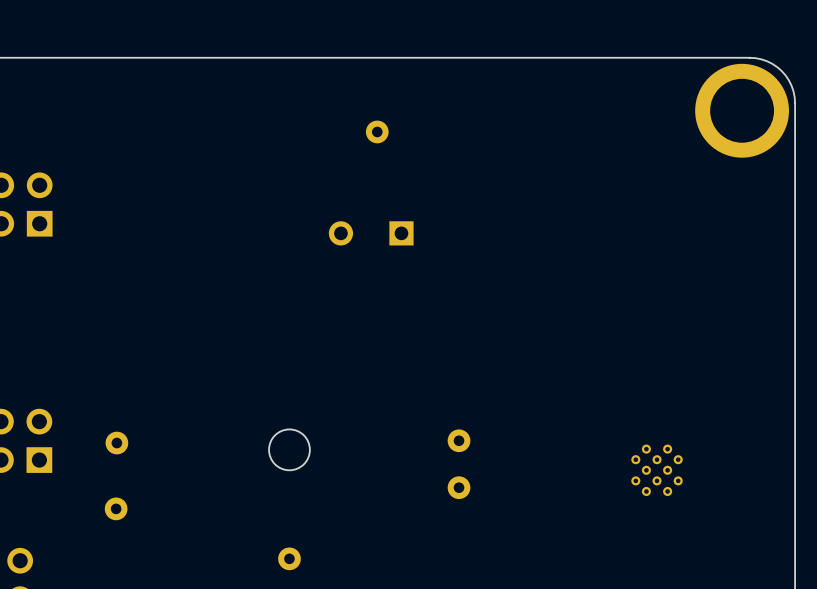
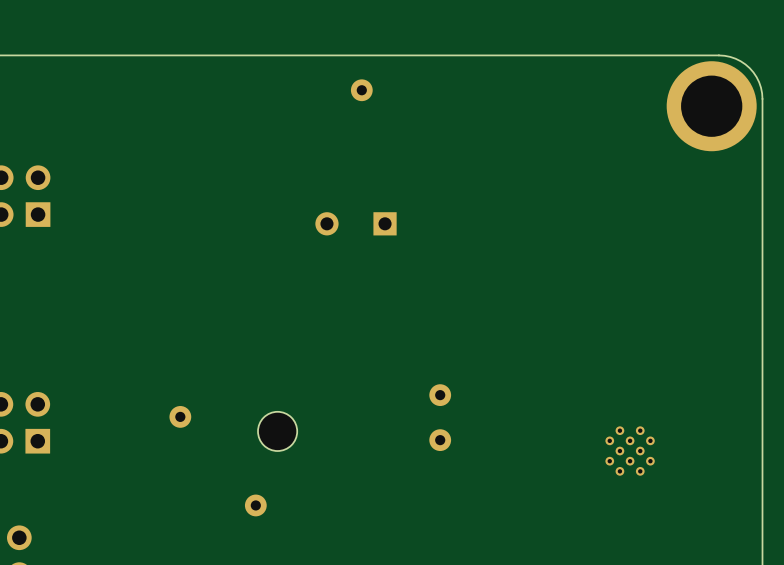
part position: (377, 131) -> (361, 90)
part: none -> (440, 395)
part: none -> (180, 416)
part: (459, 440) -> none
part: (116, 443) -> none
part: none -> (440, 440)
part: (459, 487) -> none
part: (116, 508) -> none
part position: (289, 558) -> (255, 505)

